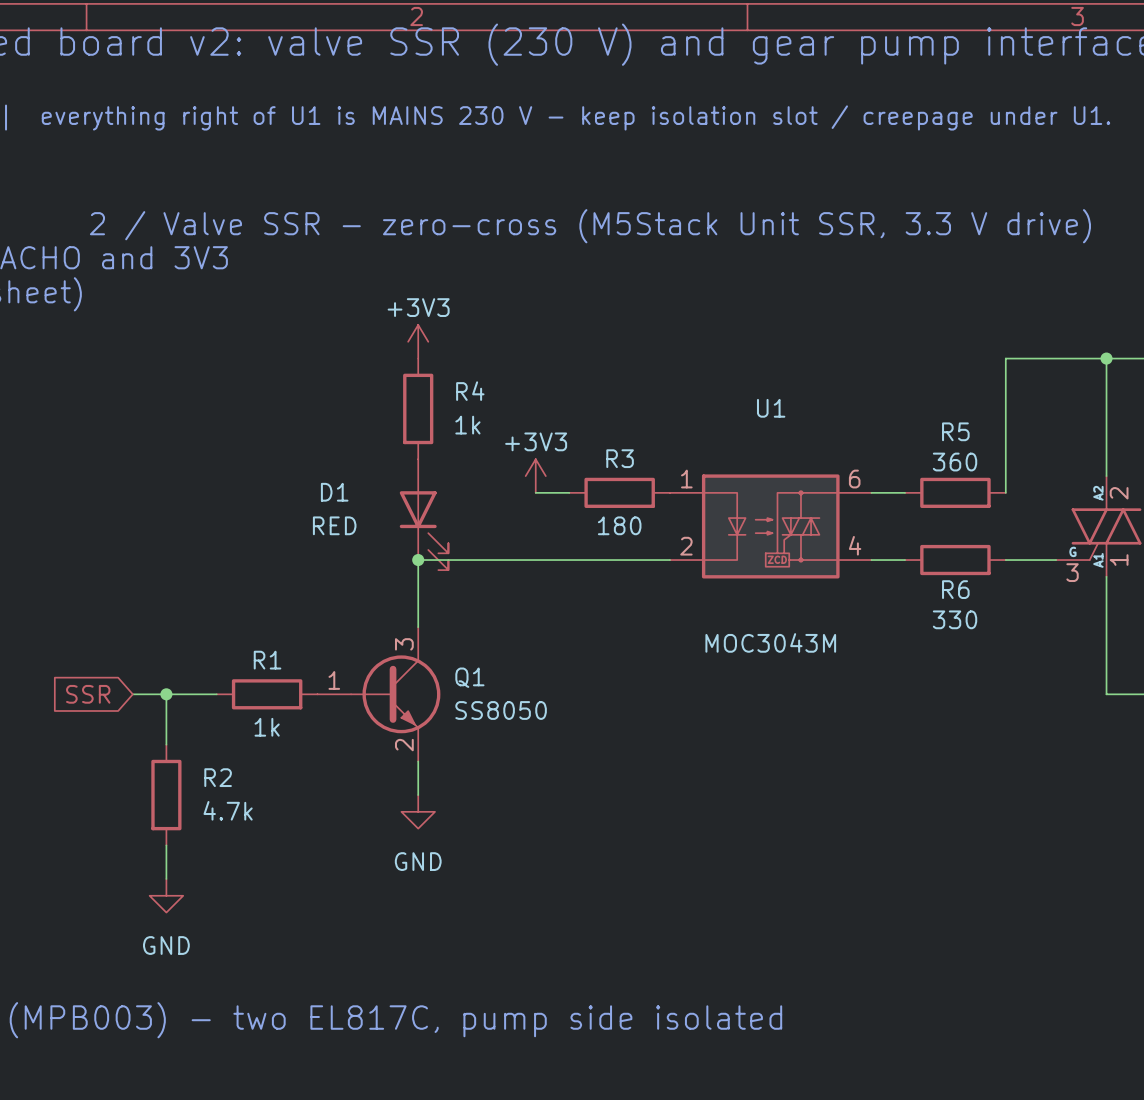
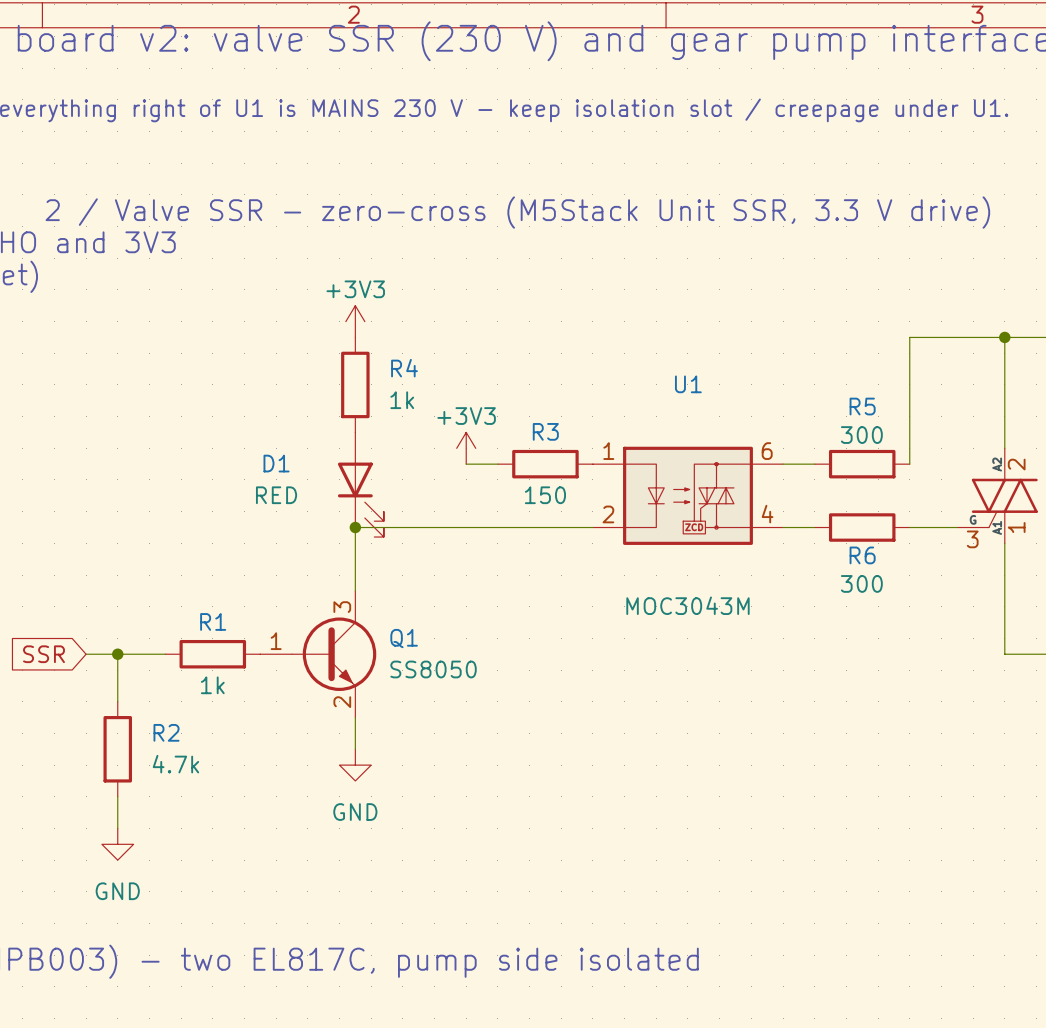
R5 value: 360 (955, 462) -> 300 (861, 435)
R3 value: 180 (619, 525) -> 150 (545, 495)
R6 value: 330 (955, 619) -> 300 (861, 583)

